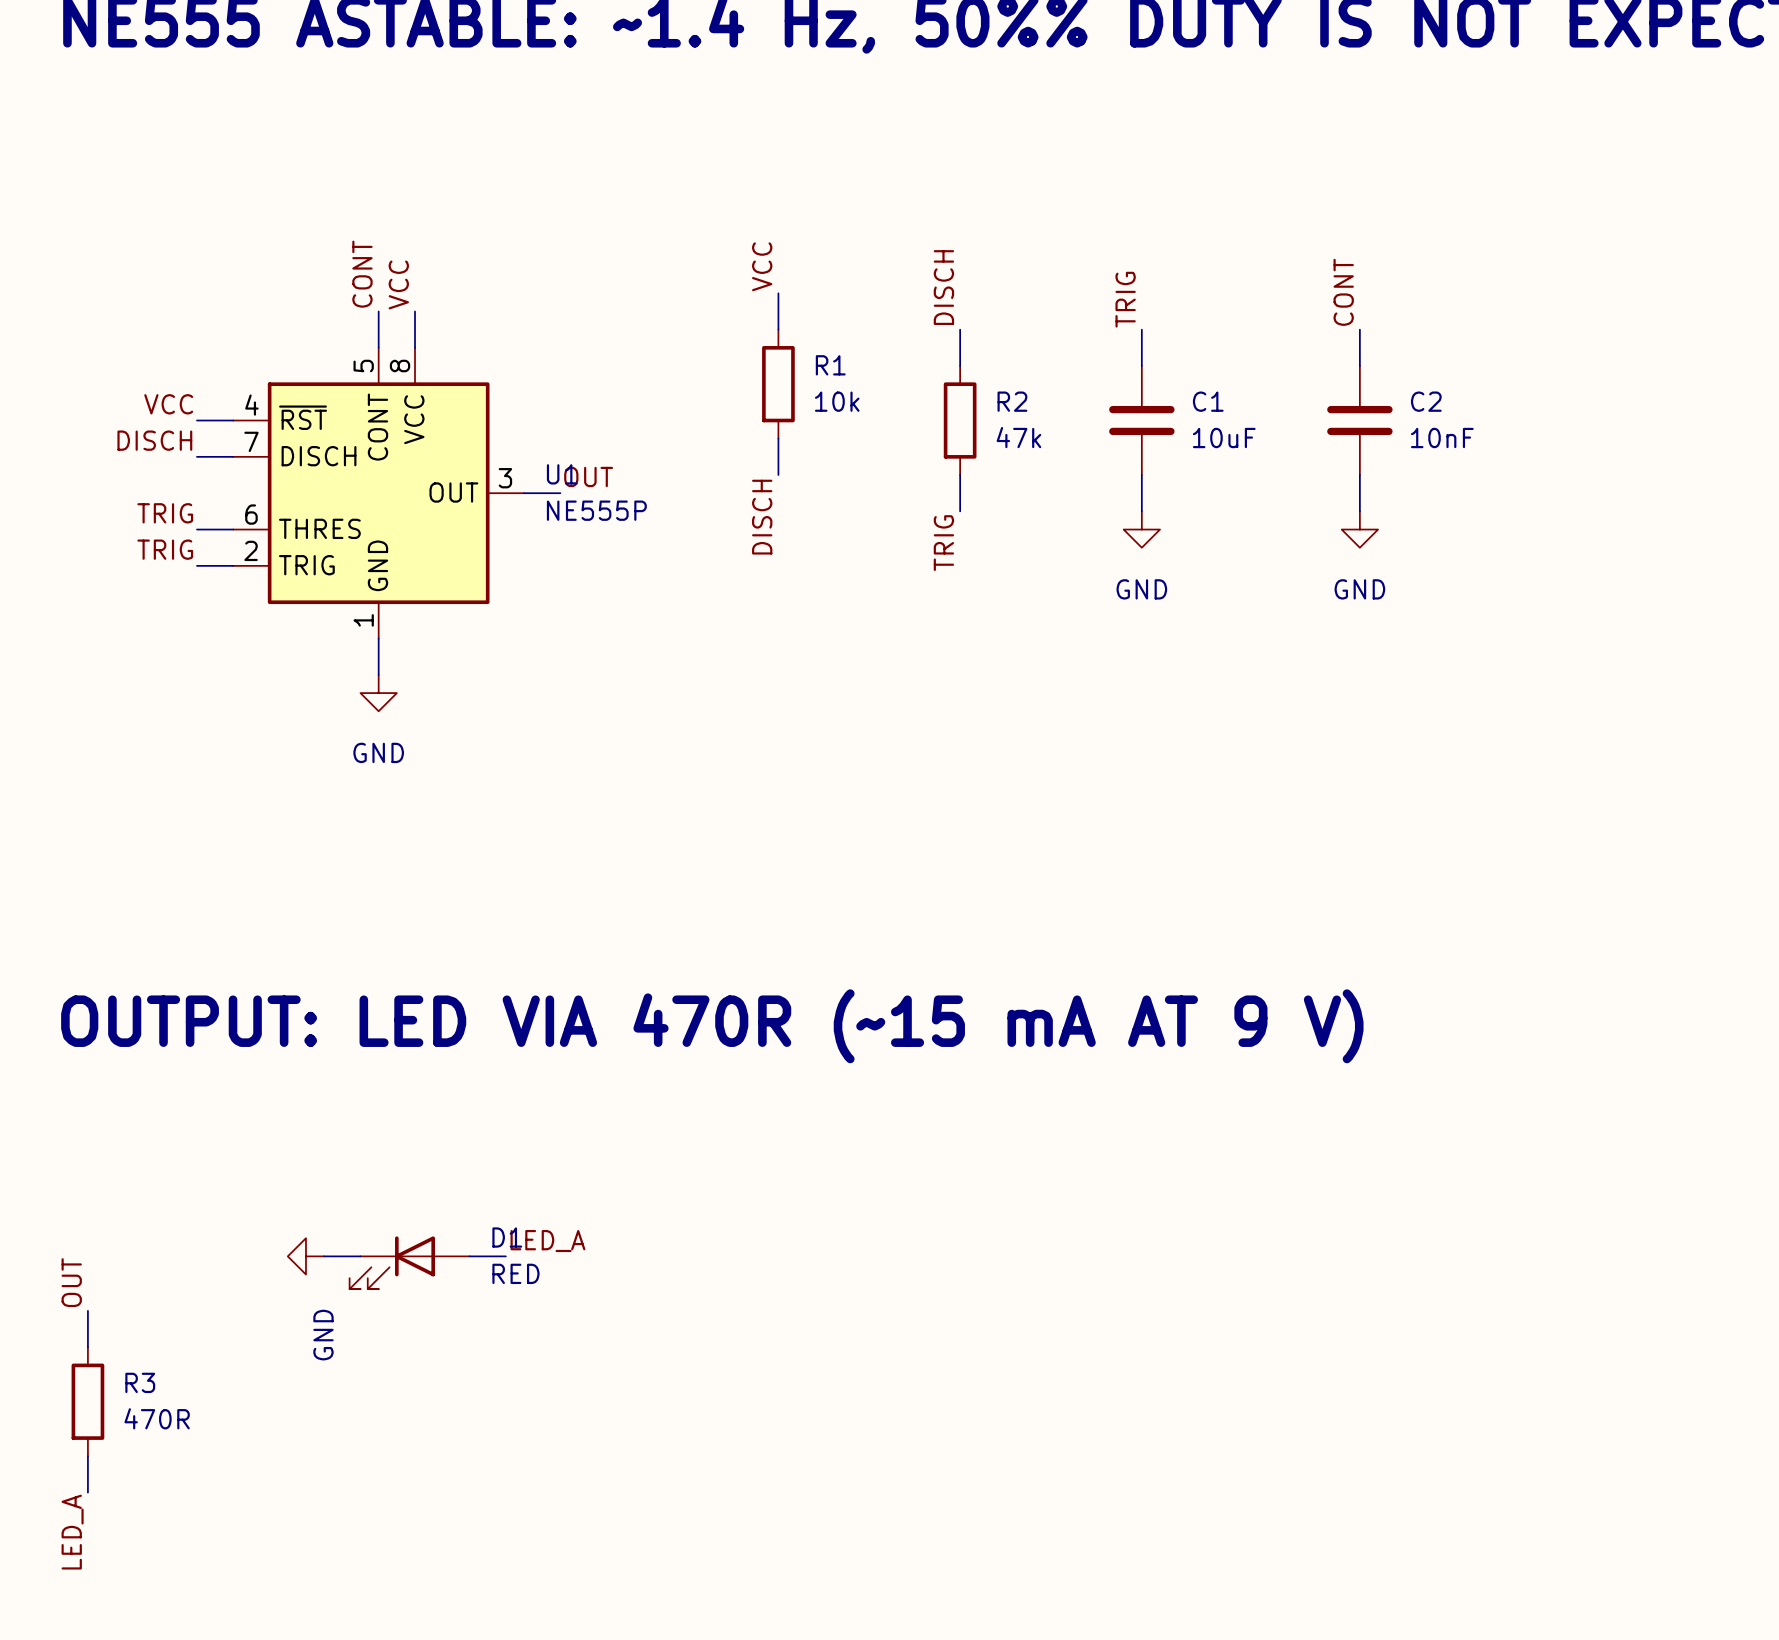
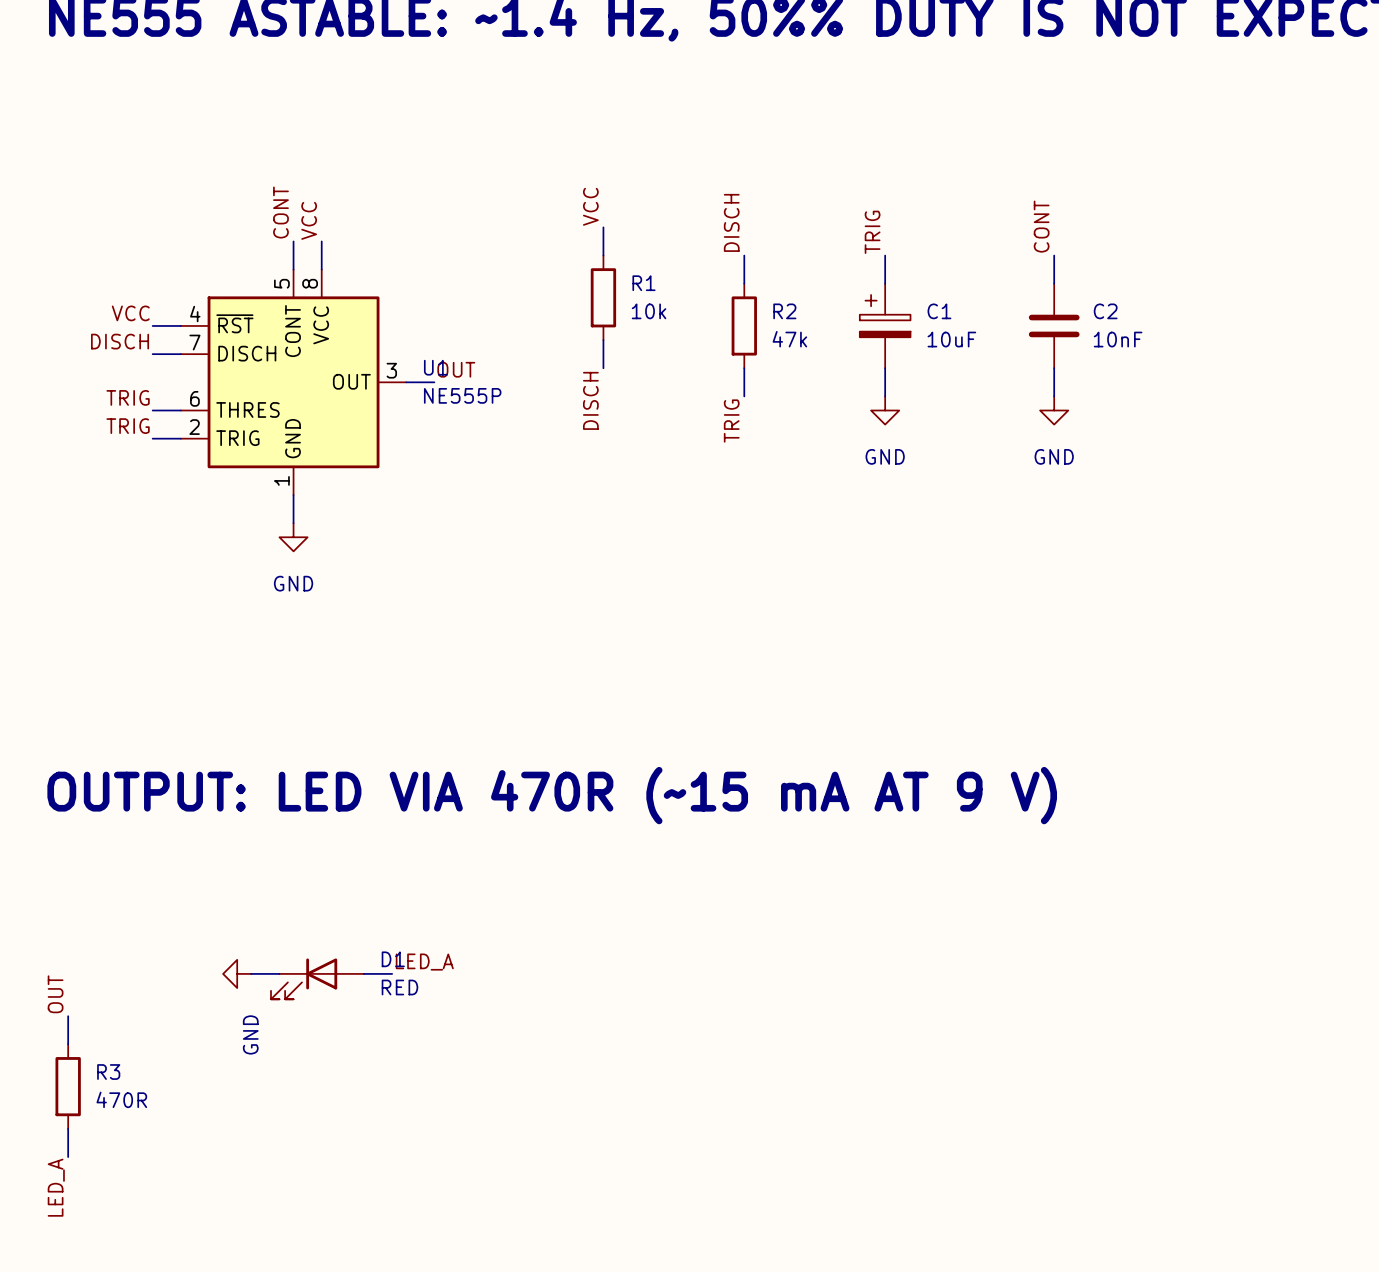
C1 symbol: [1109, 366, 1175, 476] -> [859, 283, 911, 369]

